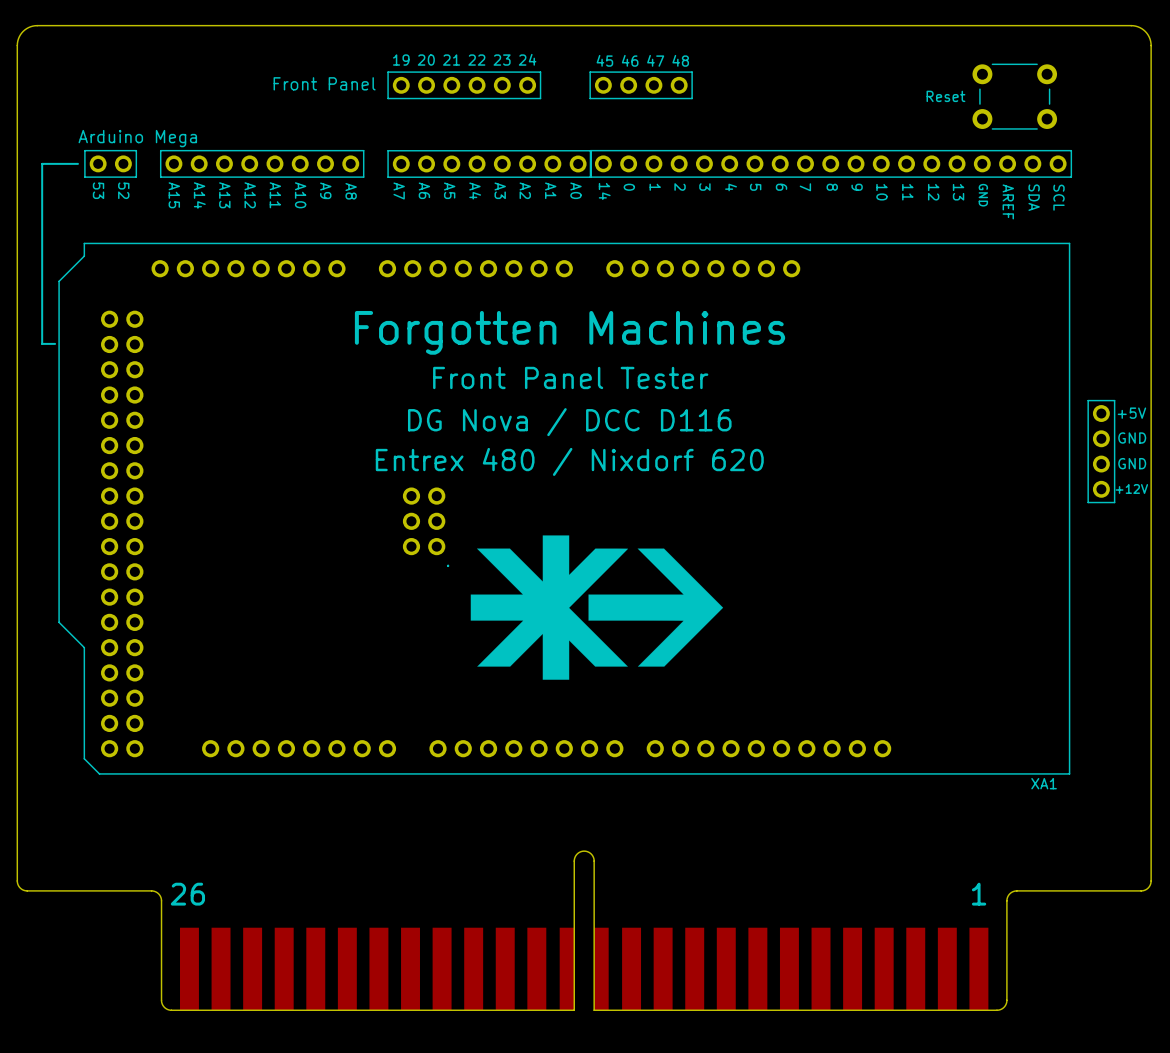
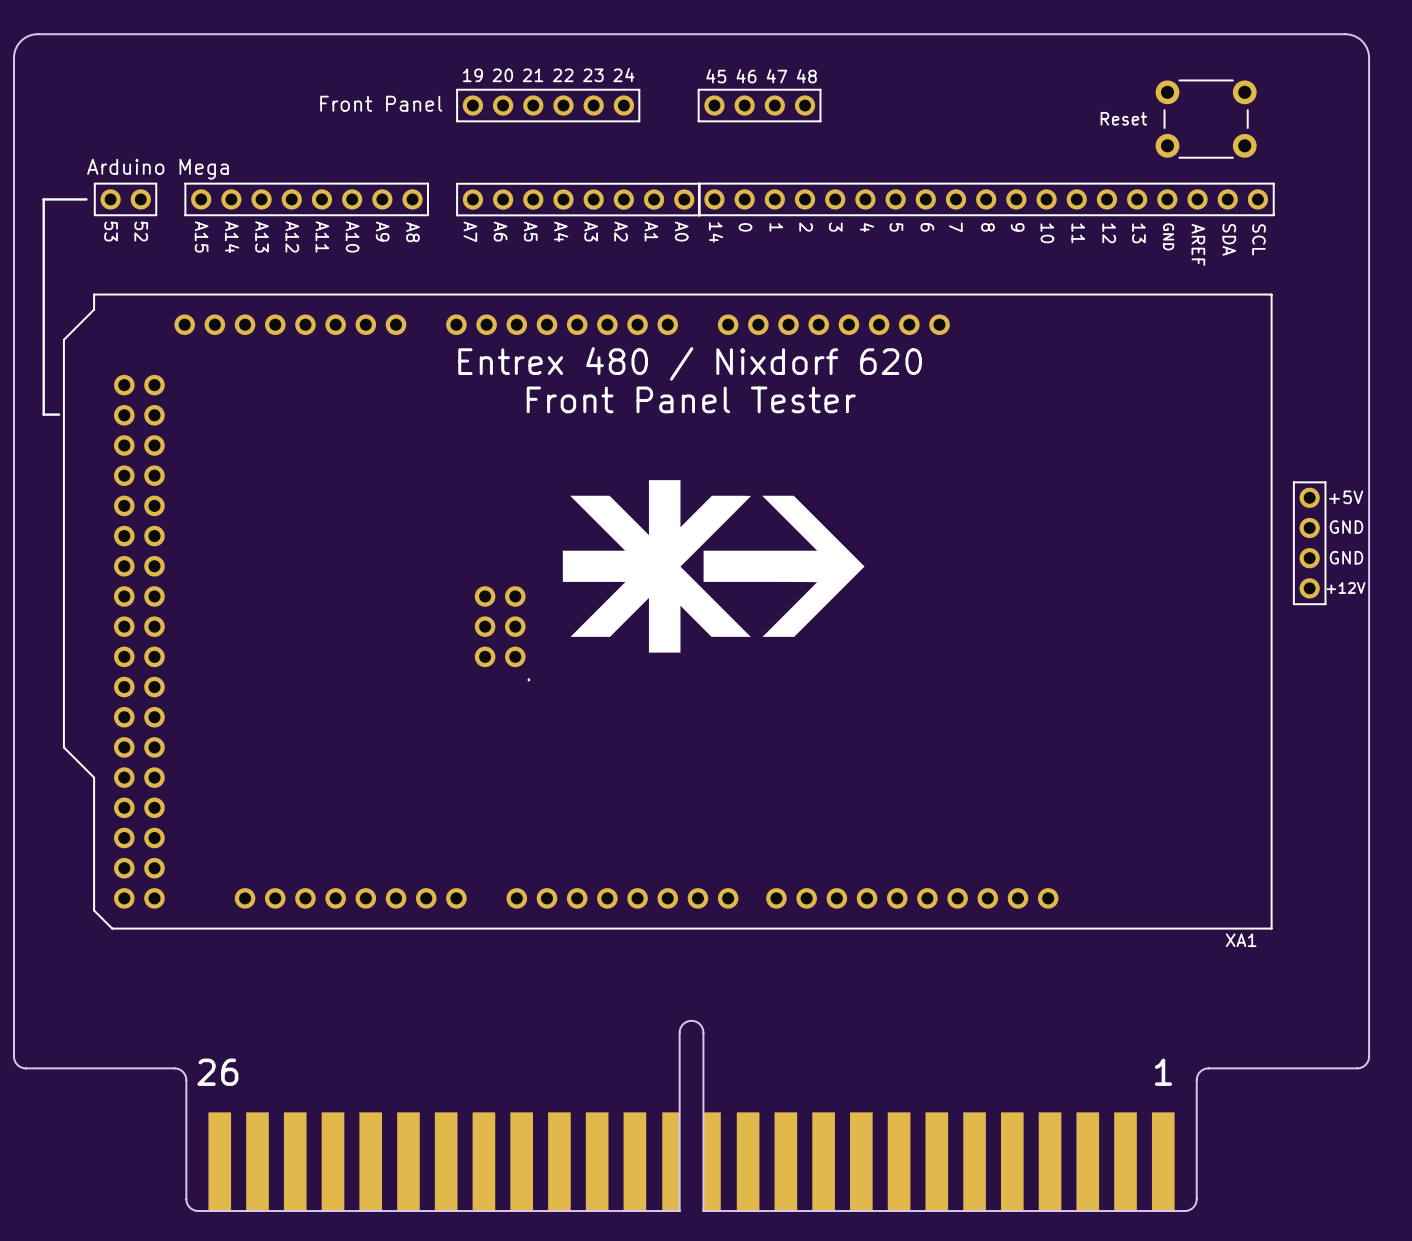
text: Forgotten Machines (570, 332) -> none
text position: Front Panel Tester (570, 377) -> Front Panel Tester (691, 399)
text: DG Nova / DCC D116 (569, 422) -> none
text position: Entrex 480 / Nixdorf 620 (569, 461) -> Entrex 480 / Nixdorf 620 (690, 363)
drawing position: (596, 607) -> (713, 566)

